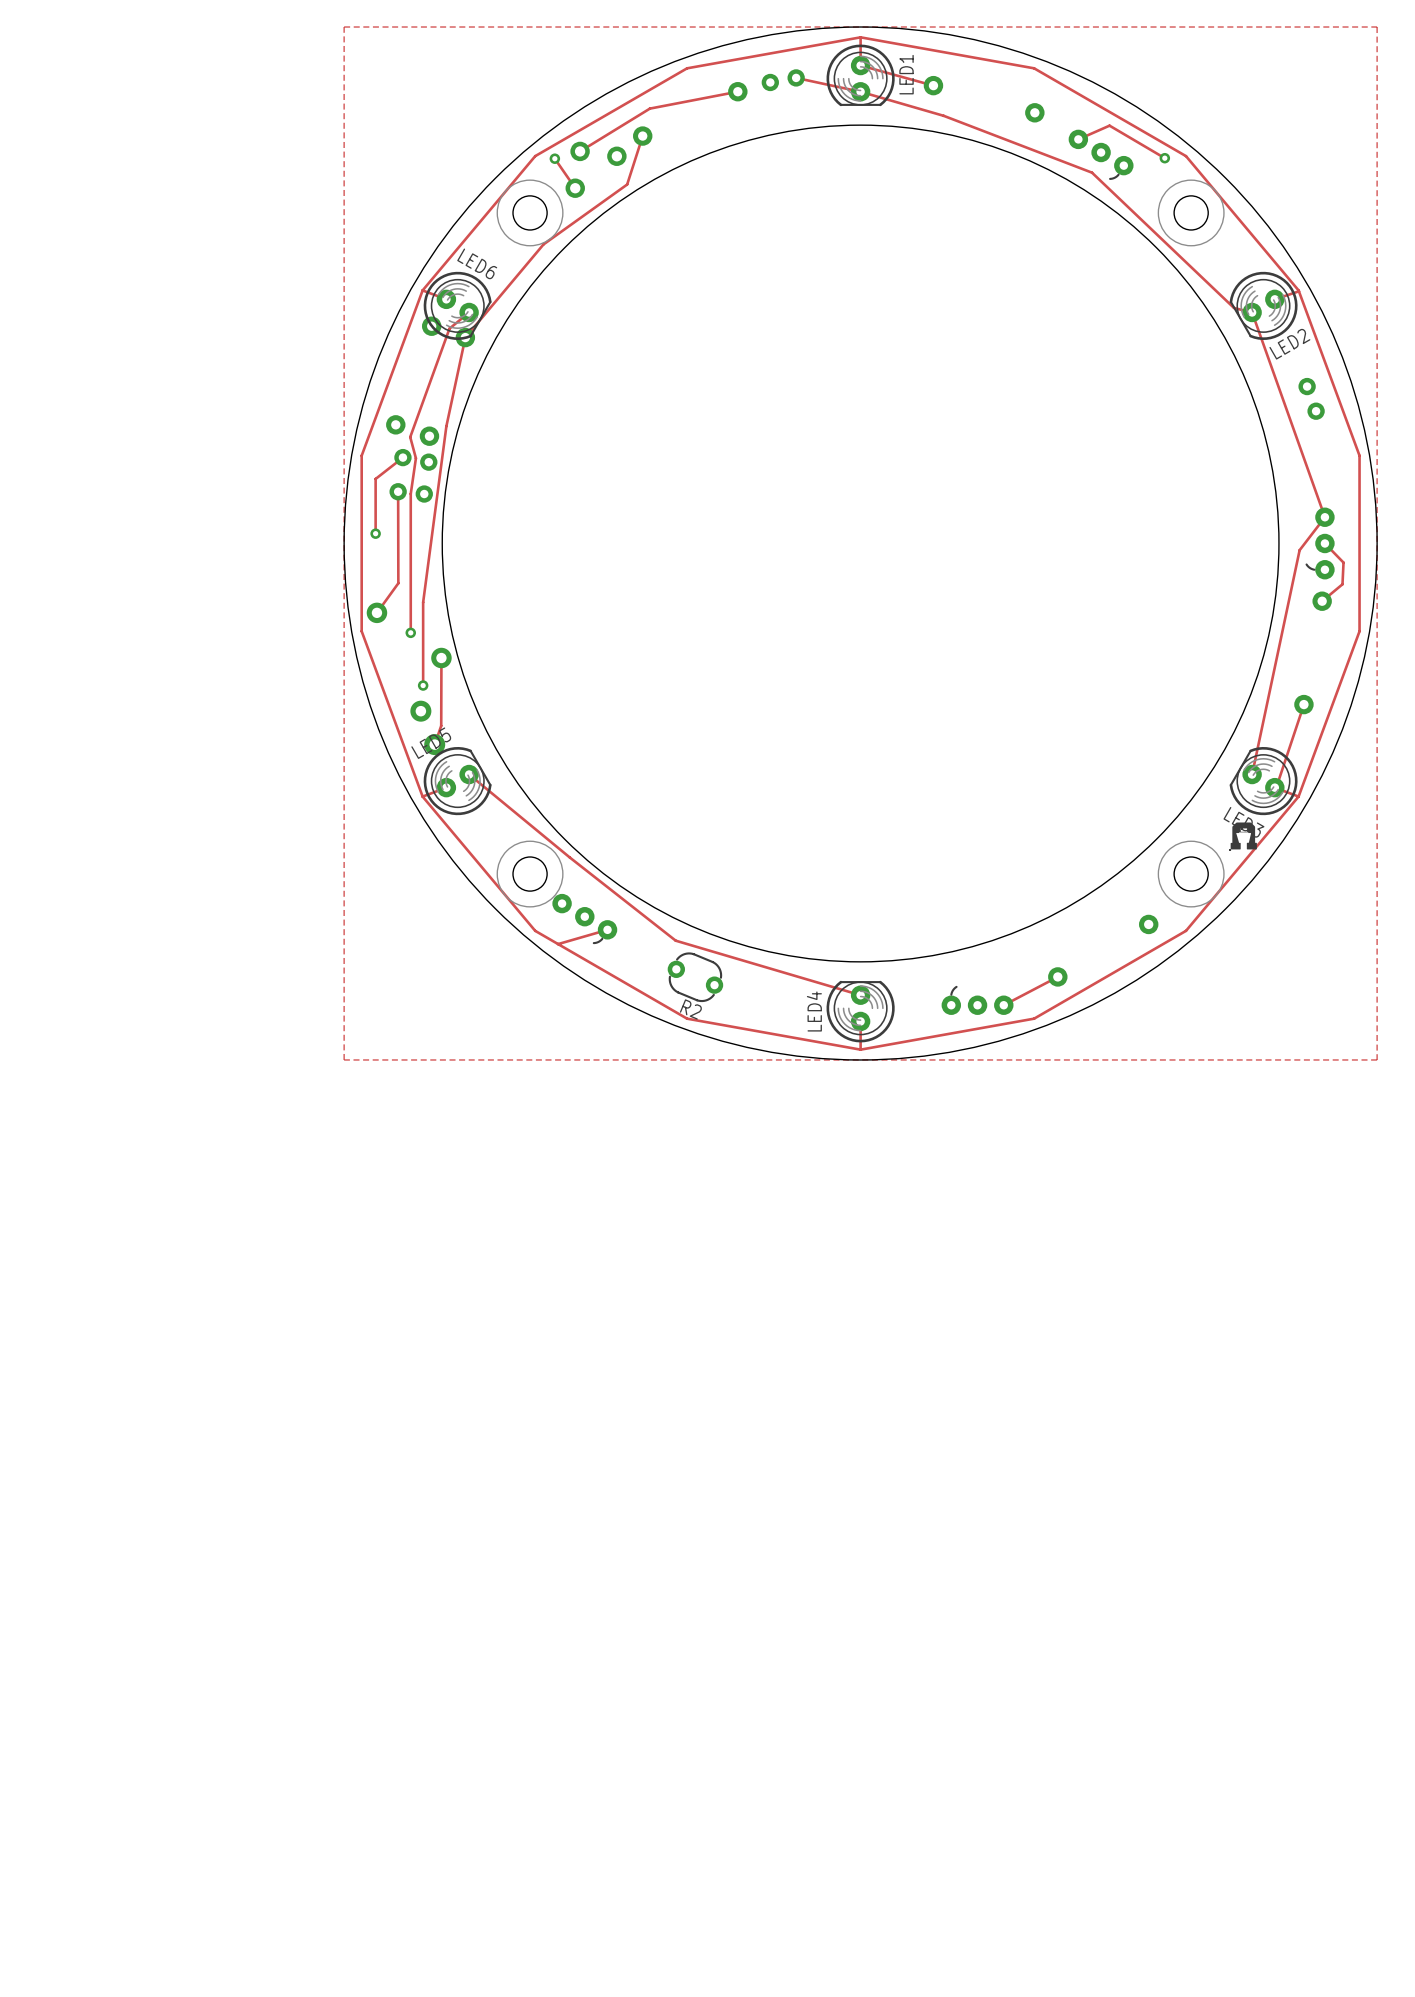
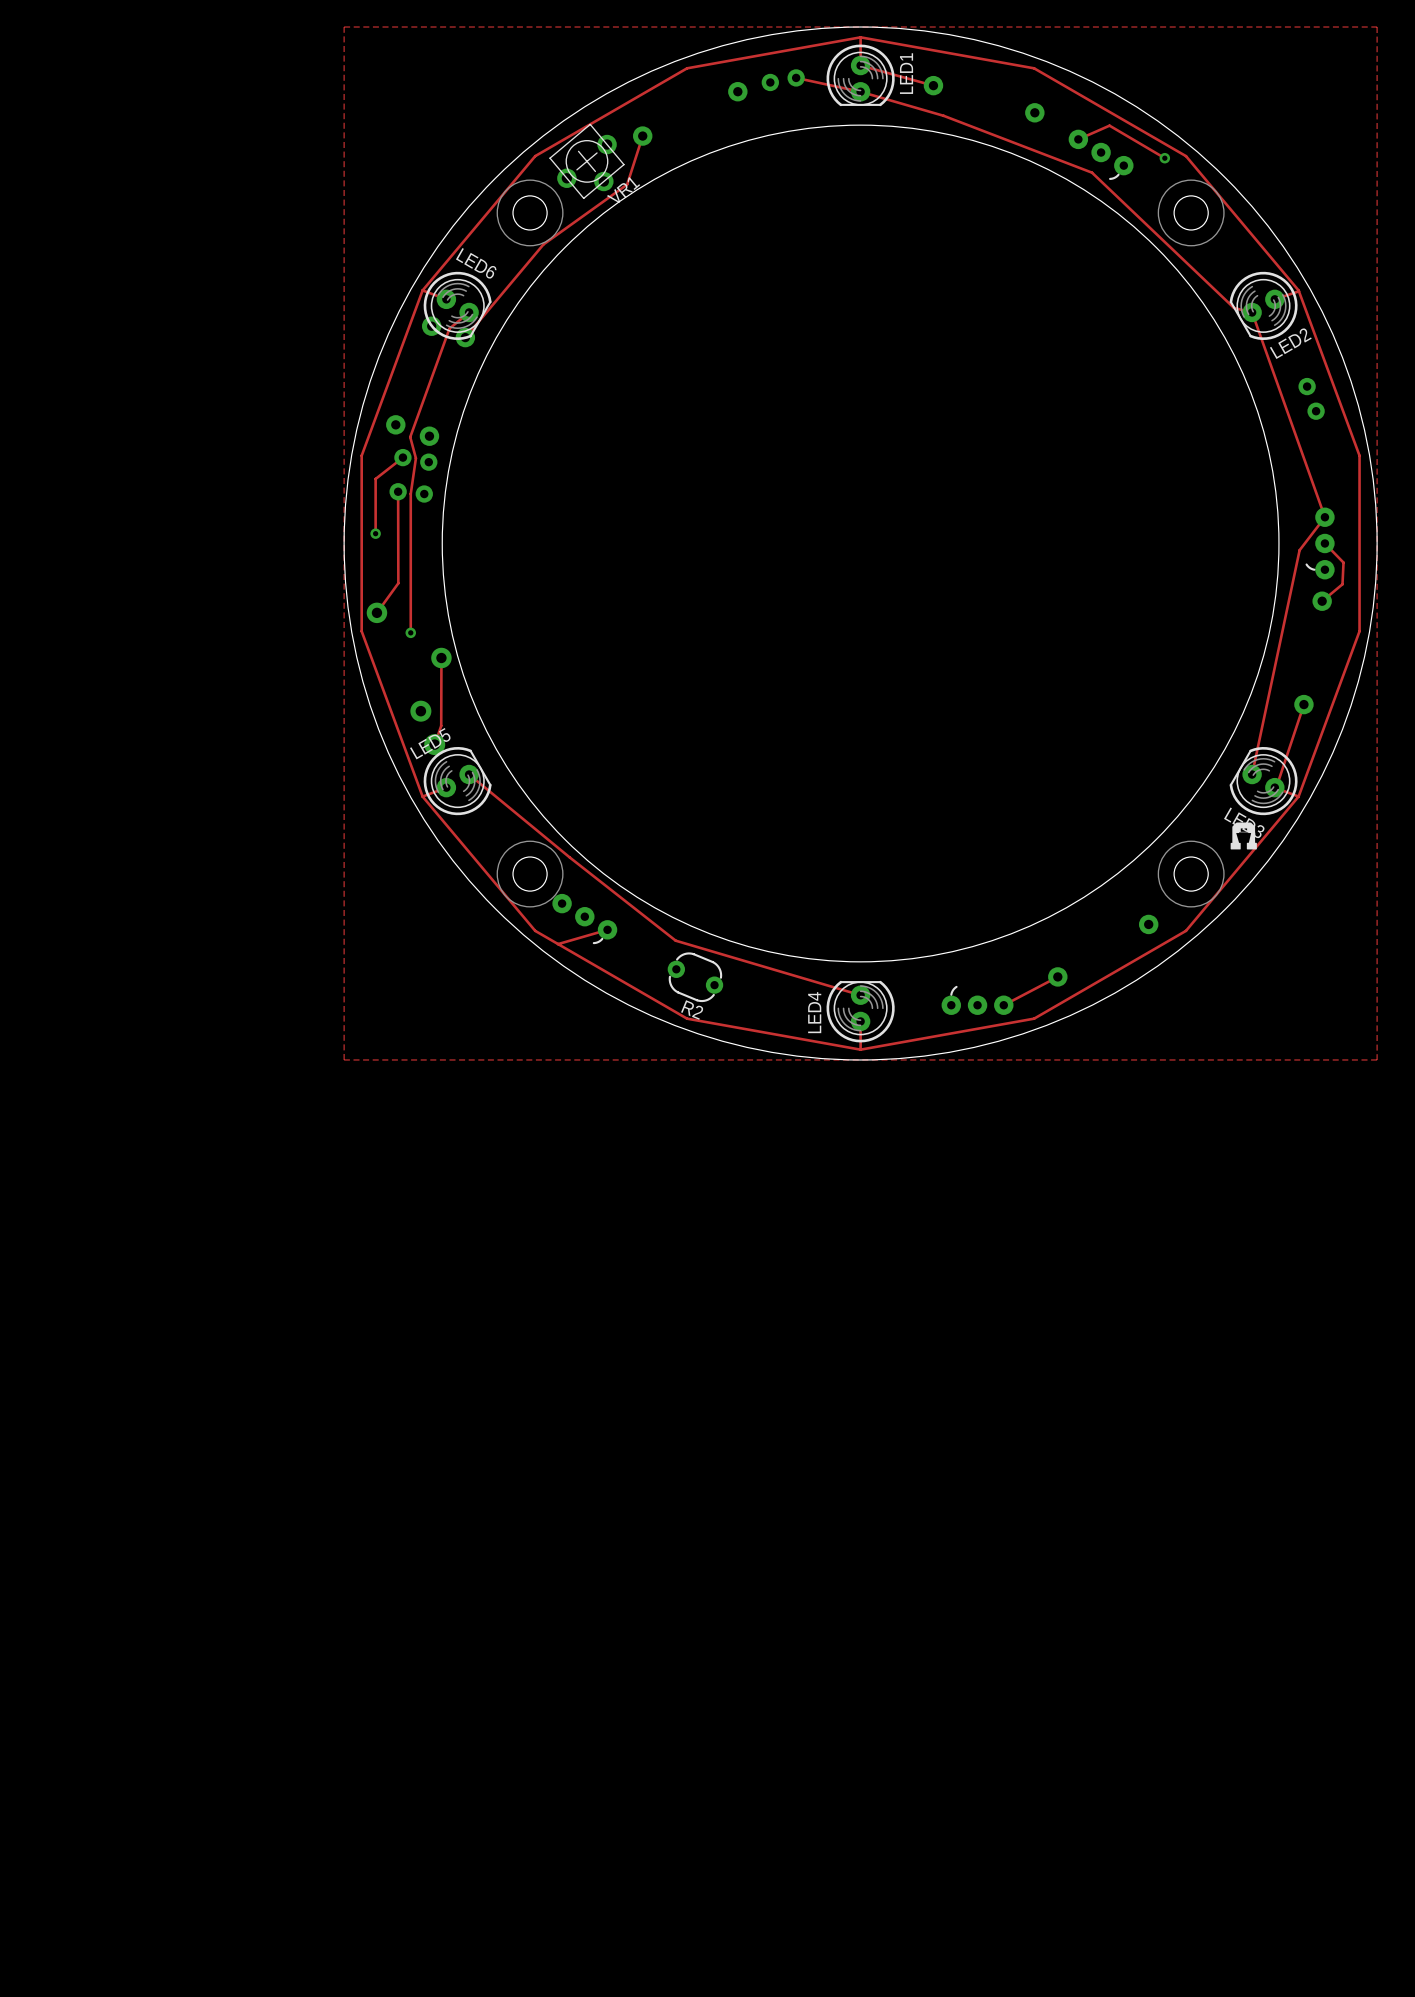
track: (737, 91) (649, 108) (580, 151) -> none
track: (554, 158) (575, 188) -> none
via: (554, 158) -> none
VR1 side: bottom (596, 169) -> top (586, 161)
track: (465, 337) (446, 426) (423, 602) (423, 685) -> none
via: (423, 685) -> none

